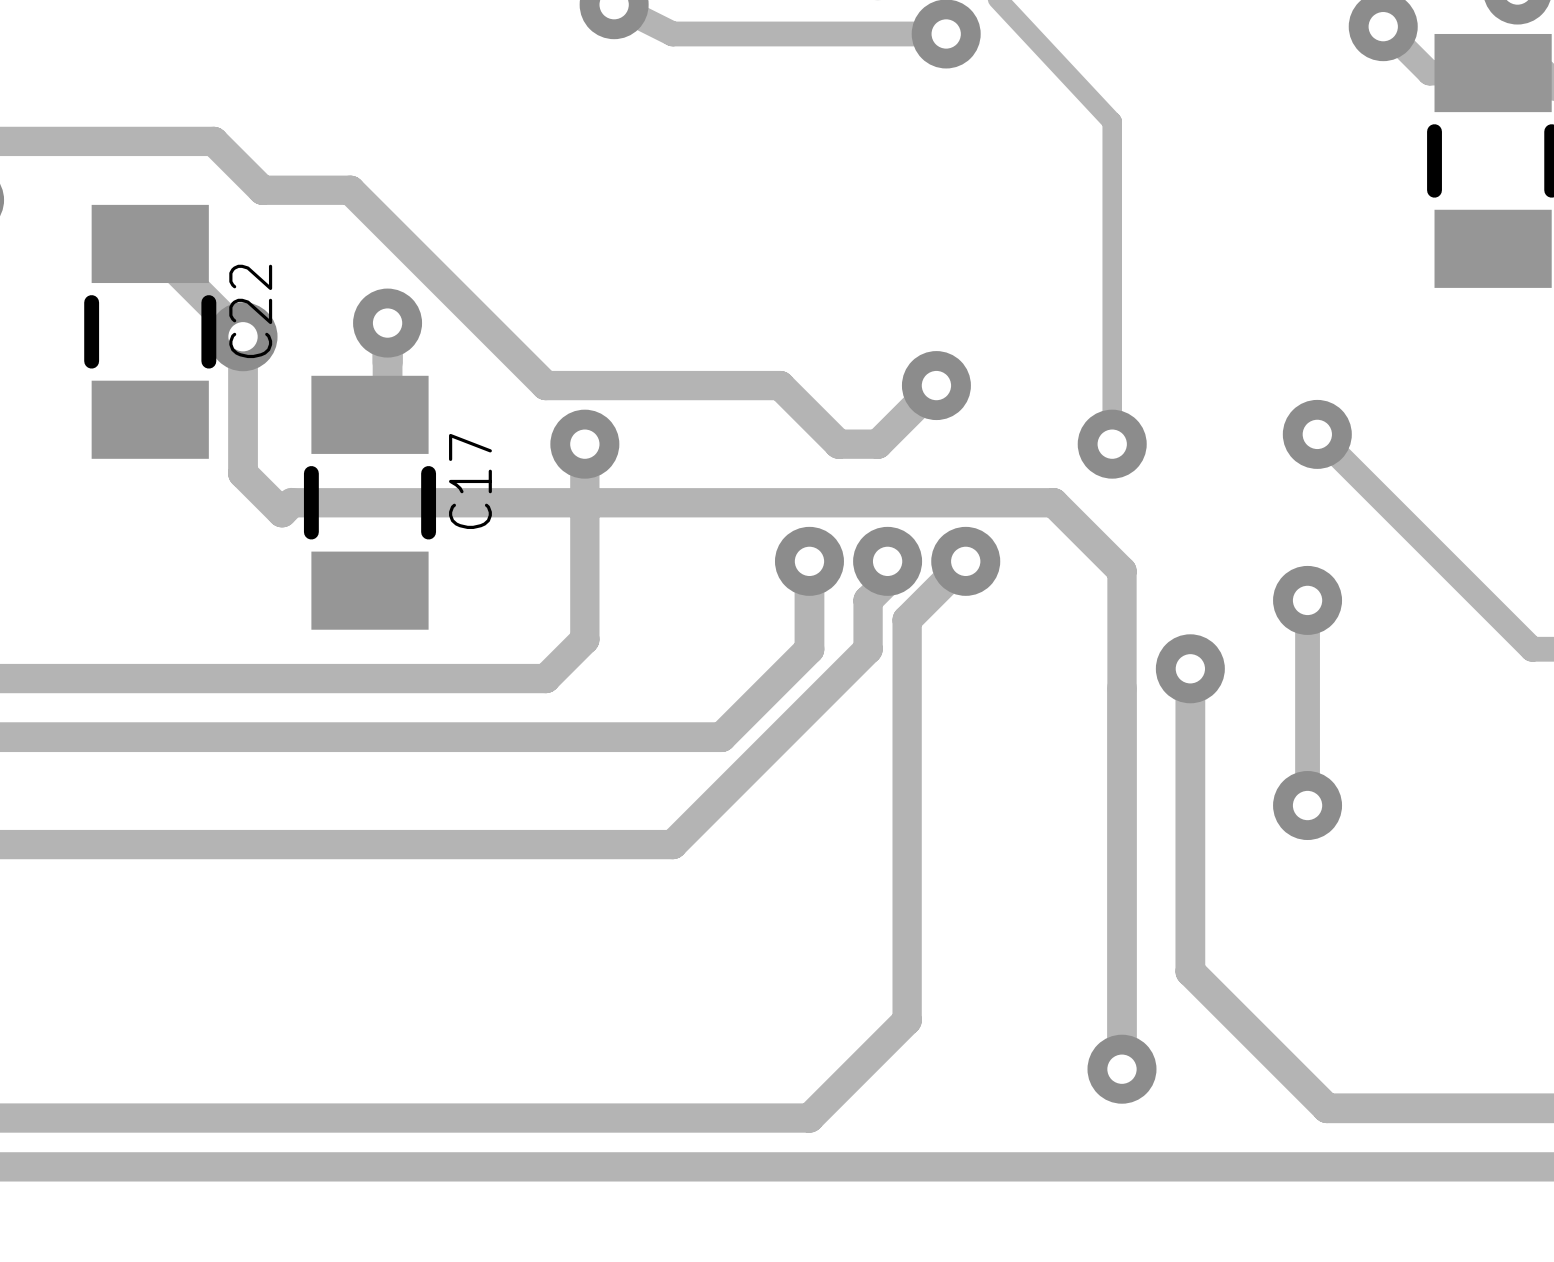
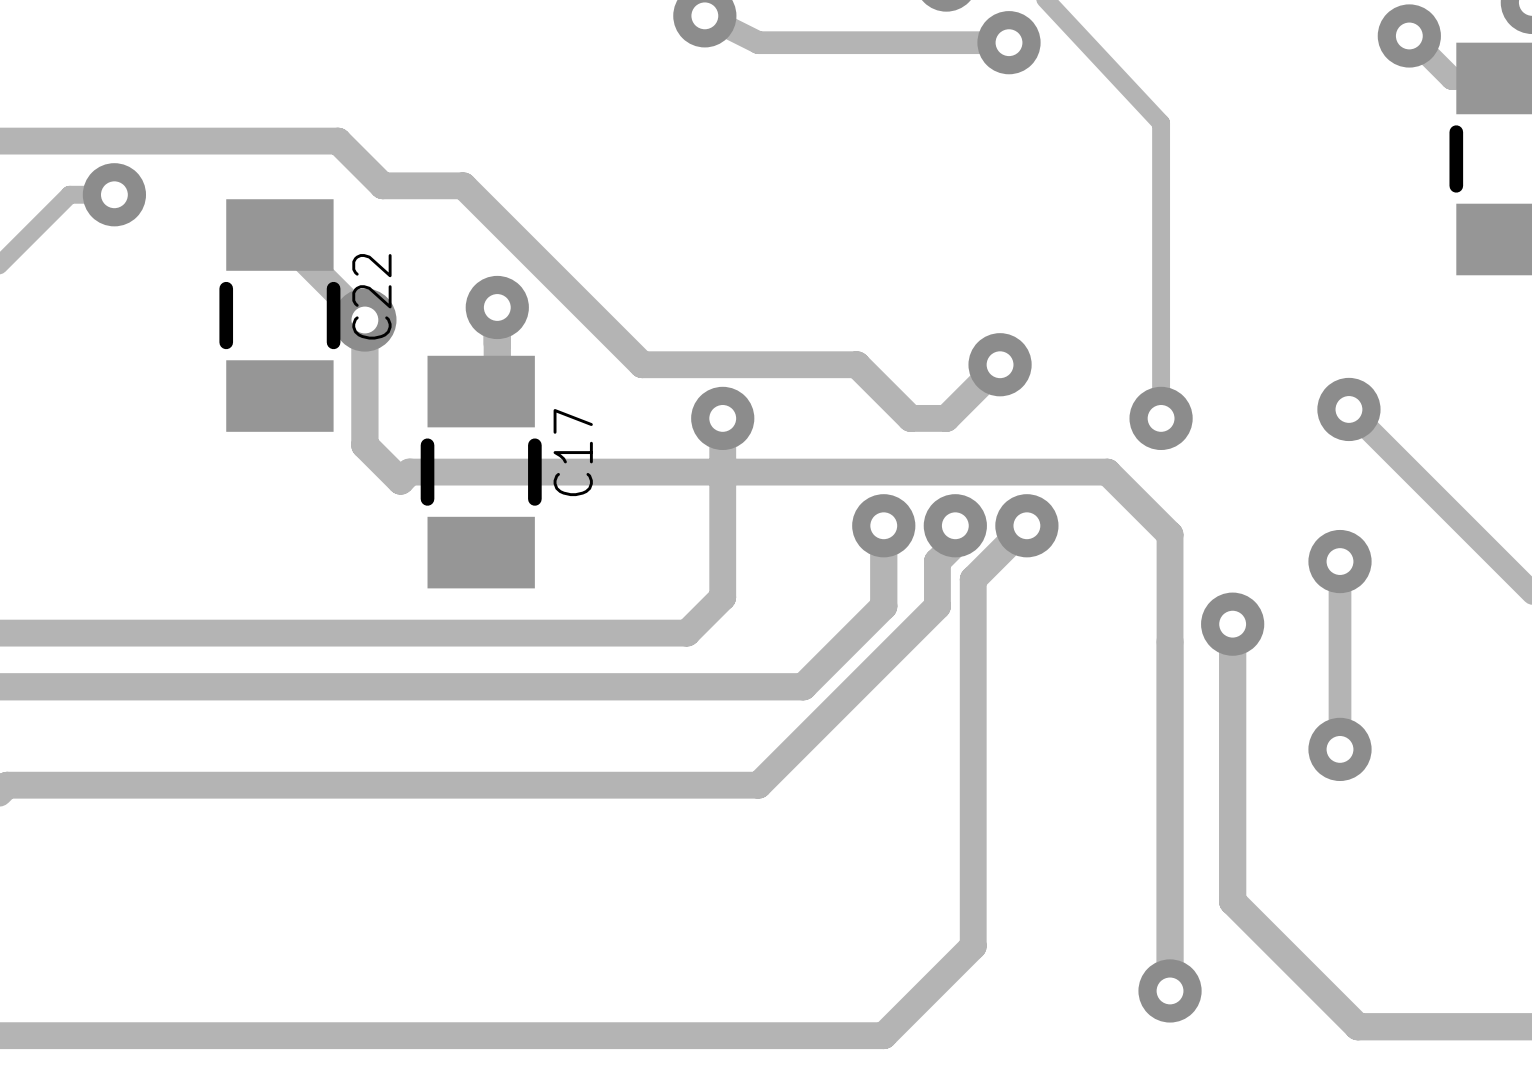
track: (584, 444) (584, 639) (545, 678) -> (722, 418) (722, 597) (686, 633) (642, 633)
via position: (584, 444) -> (722, 418)

